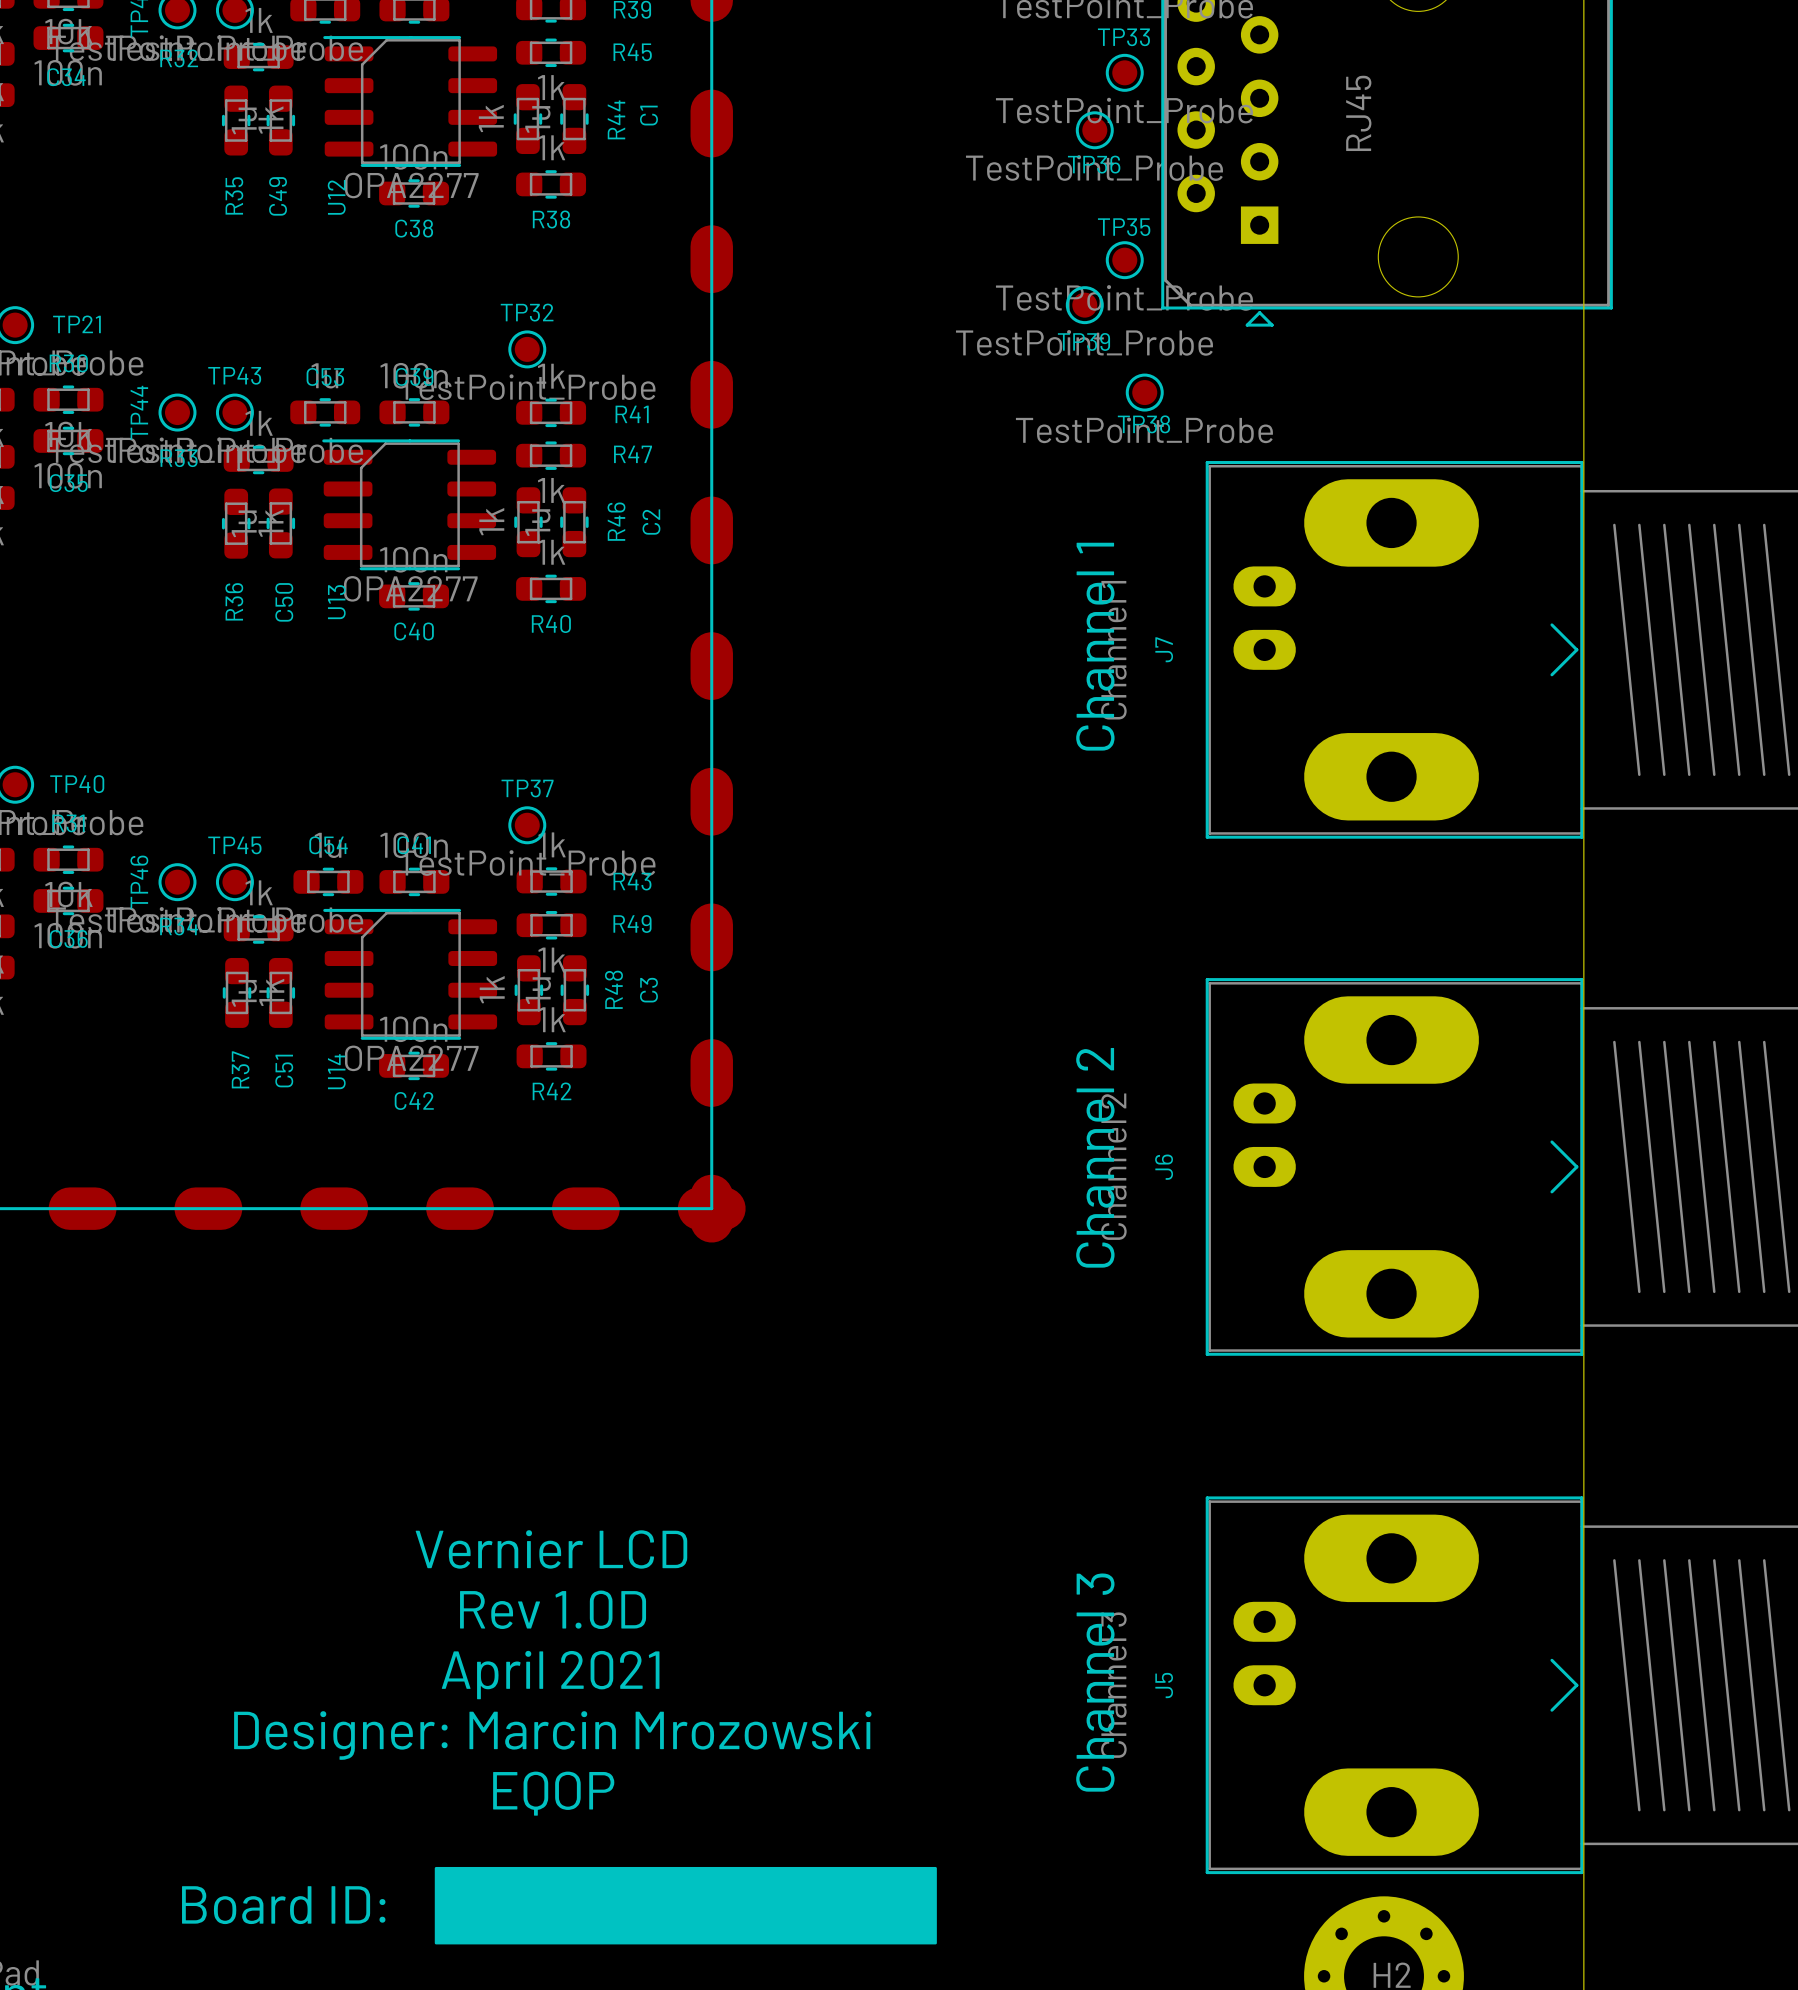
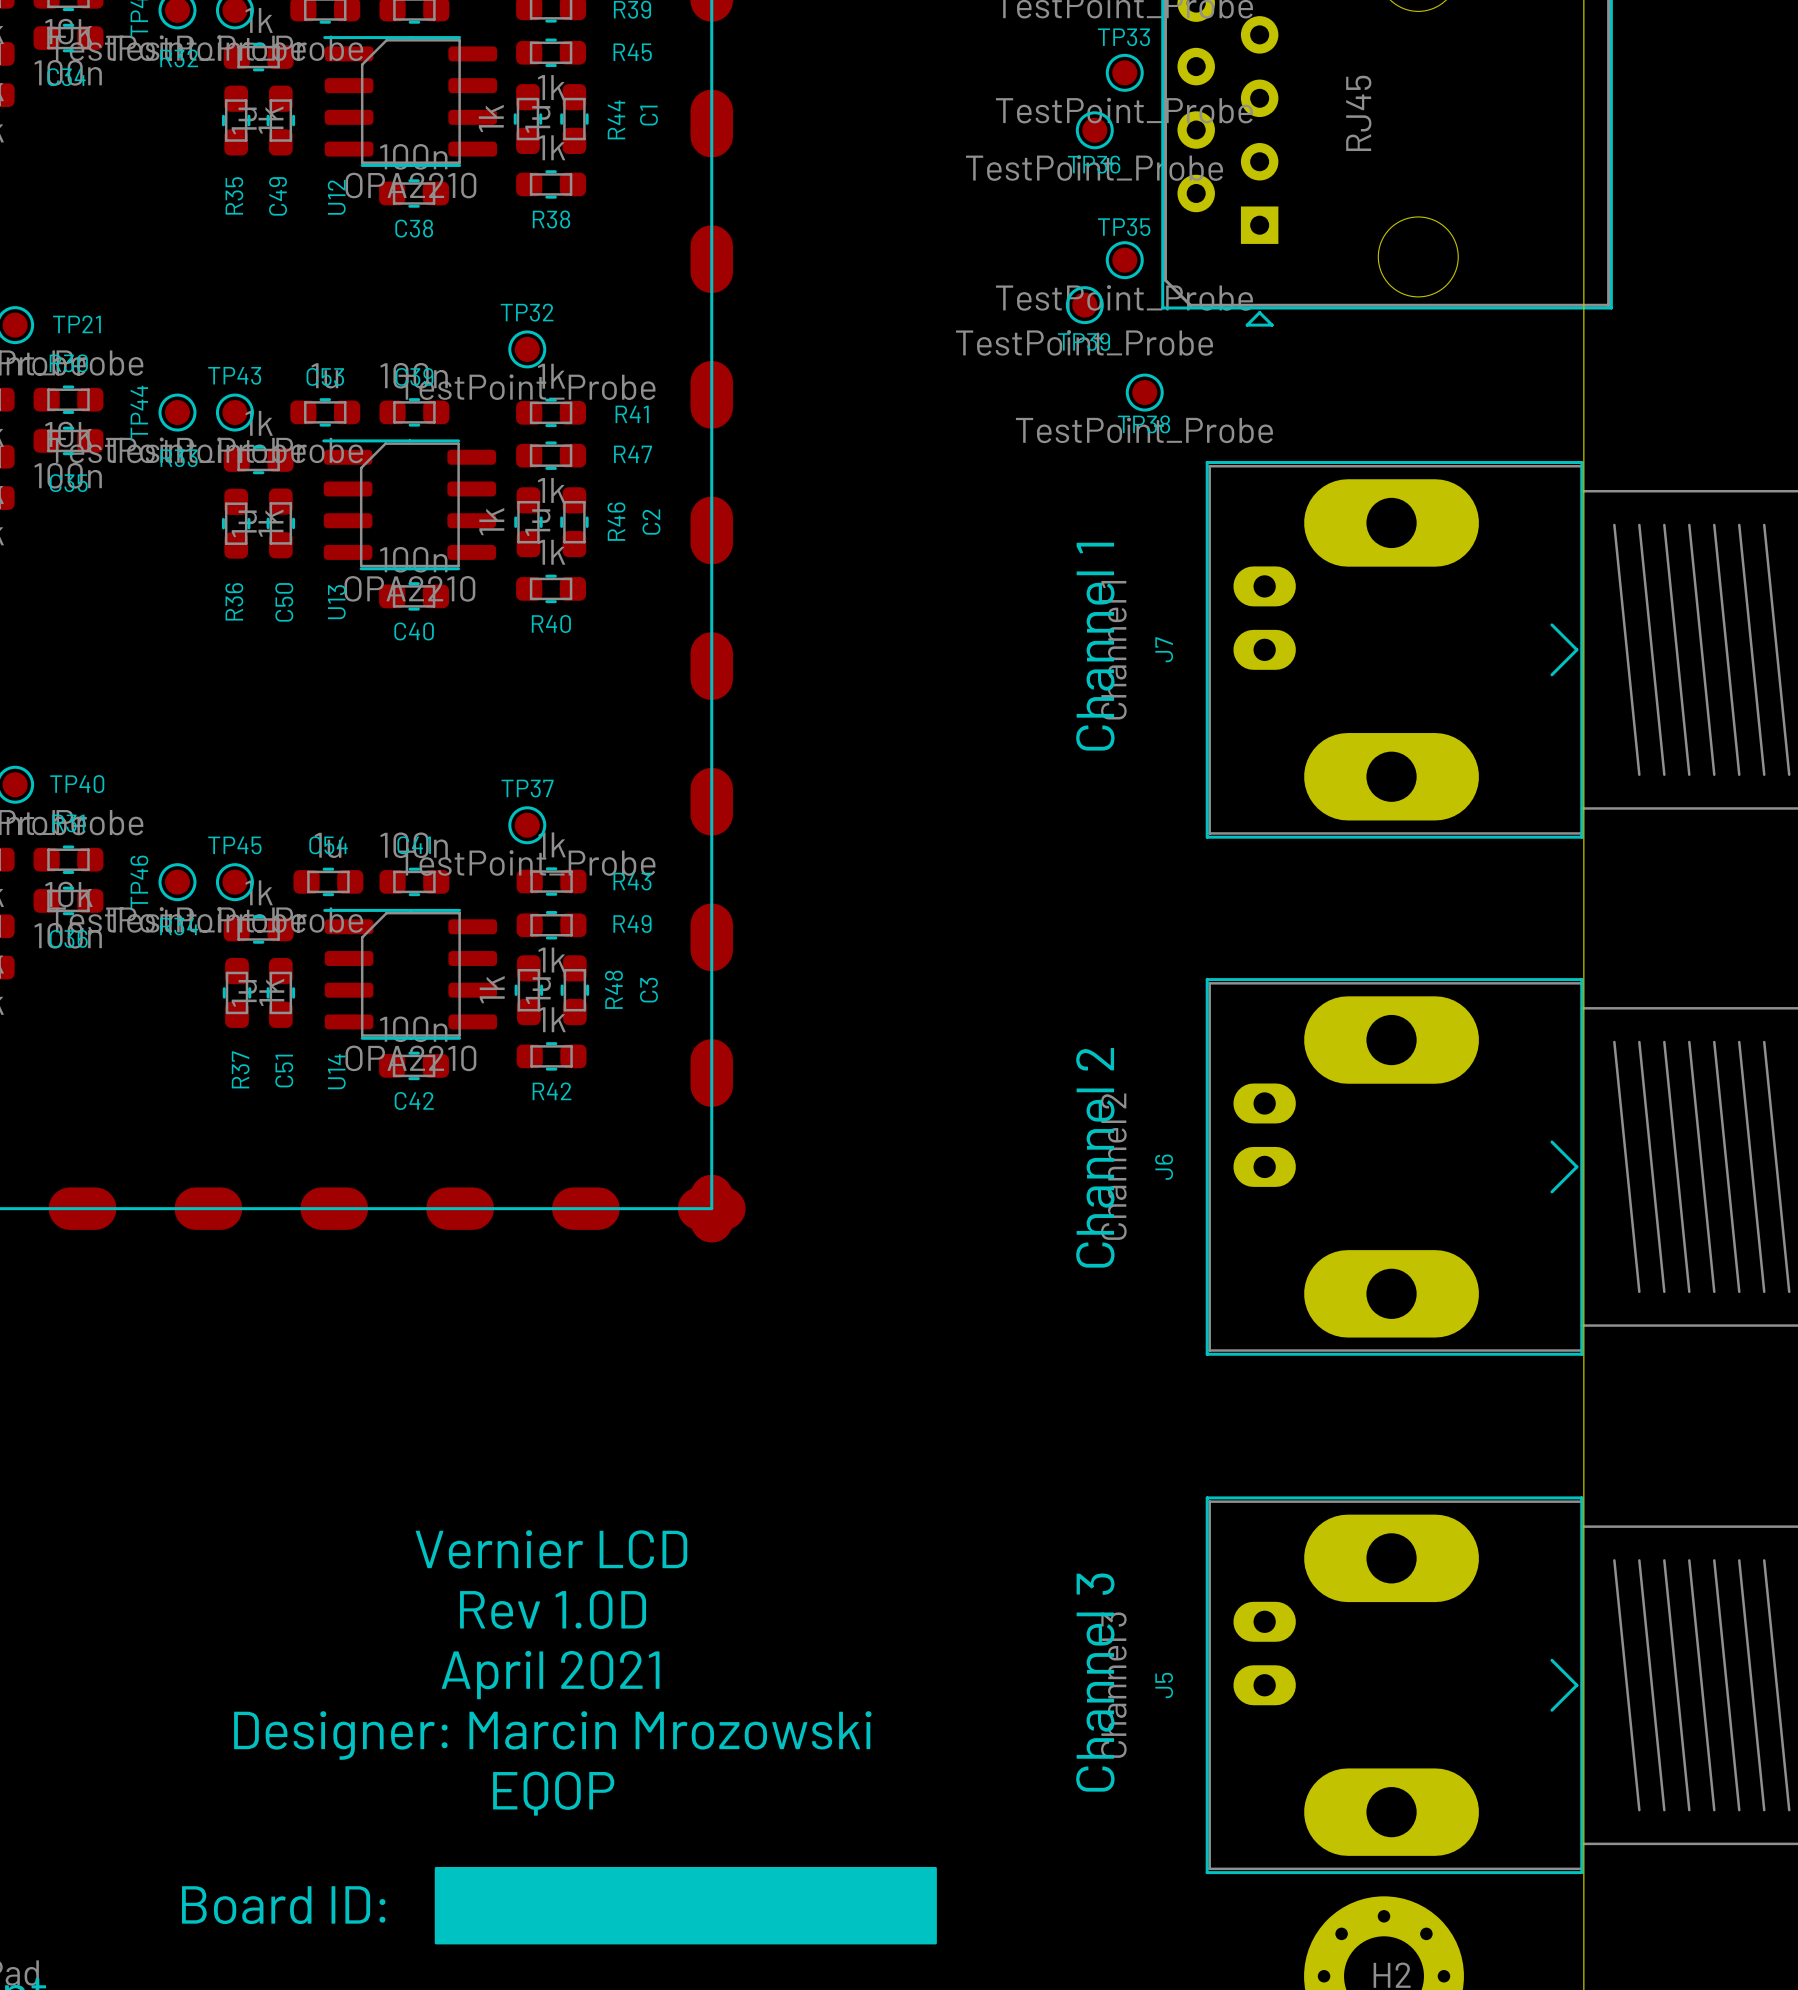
U12 value: OPA2277 (411, 185) -> OPA2210 (410, 185)
U13 value: OPA2277 (410, 588) -> OPA2210 (409, 588)
U14 value: OPA2277 (411, 1058) -> OPA2210 (410, 1058)

